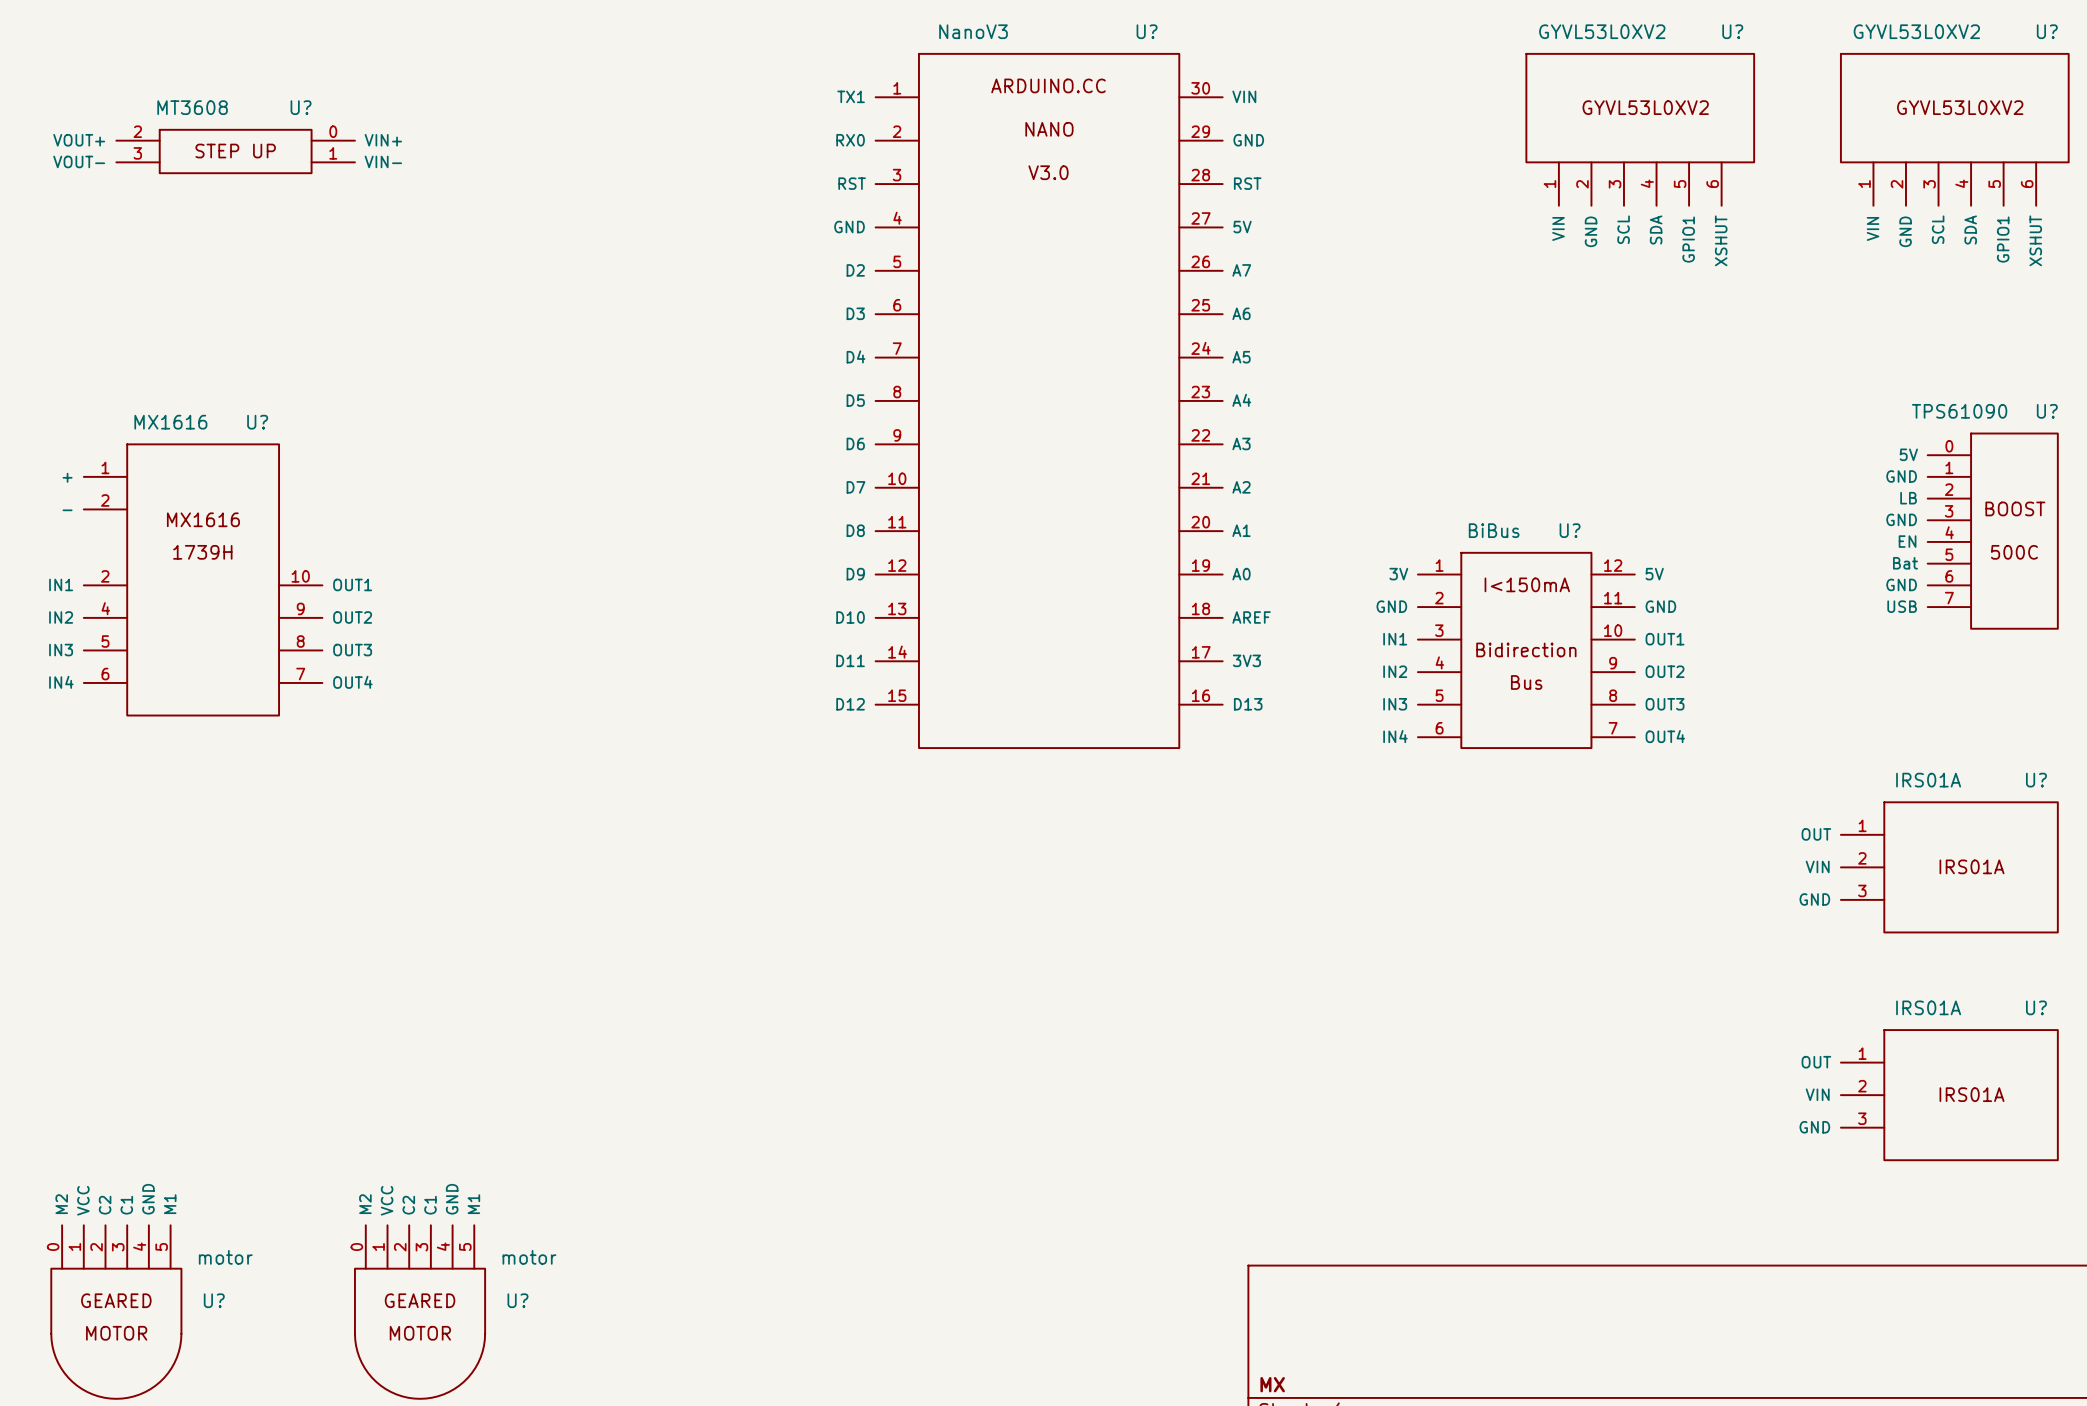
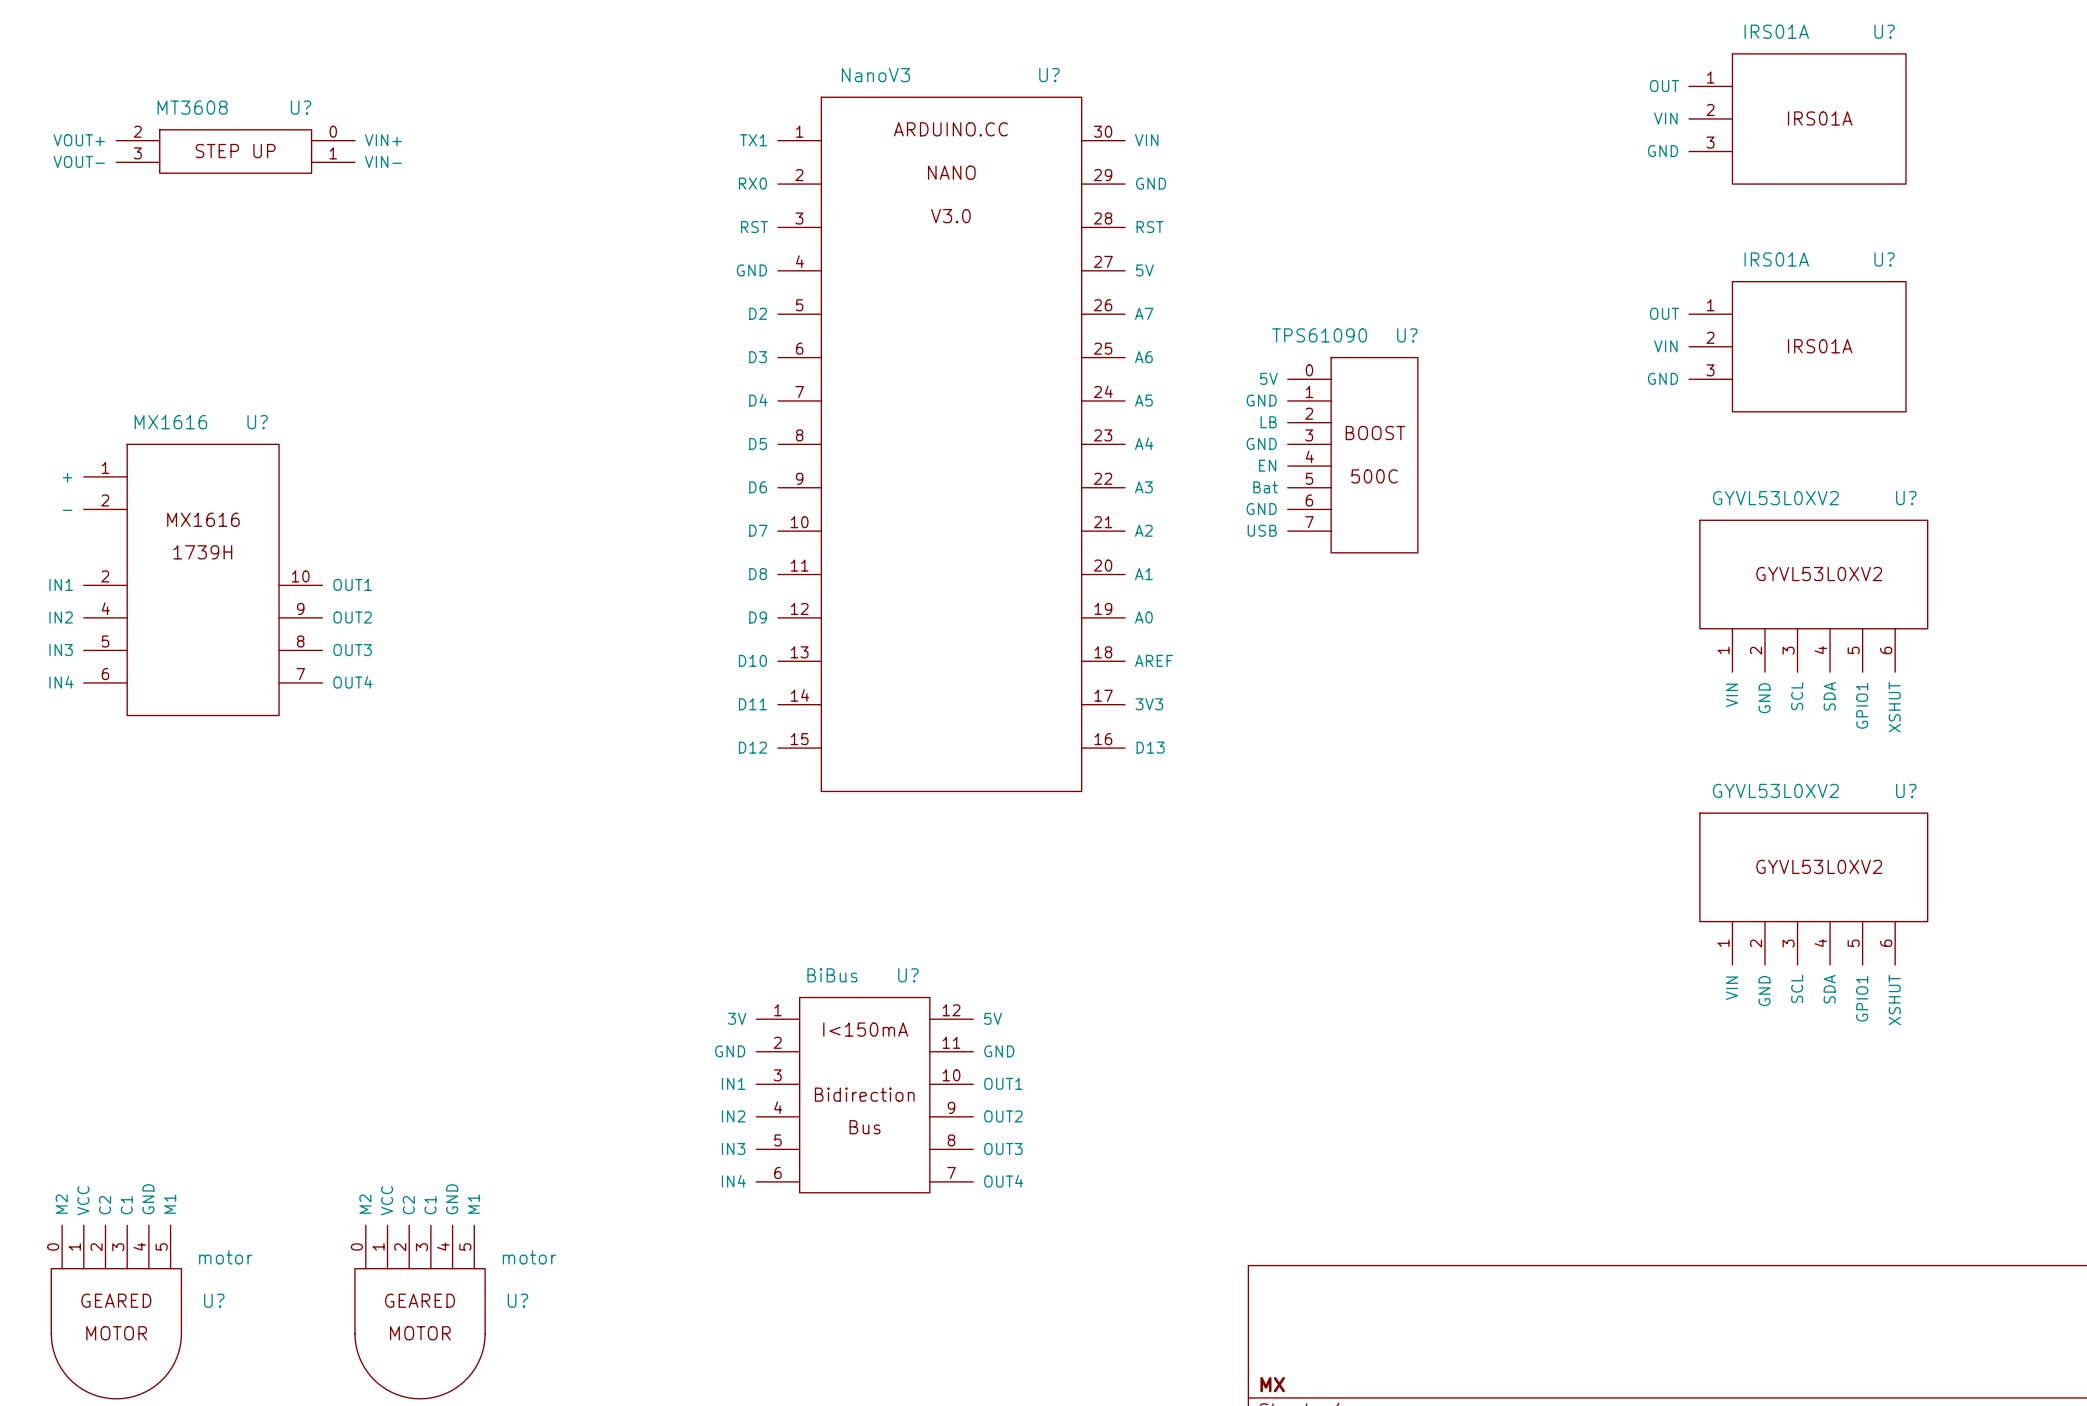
U?: none -> IRS01A (1797, 118)
U?: GYVL53L0XV2 (1640, 129) -> none
U?: GYVL53L0XV2 (1954, 129) -> none
U?: none -> IRS01A (1797, 346)
U? position: (669, 400) -> (571, 444)
U?: none -> TPS61090 (1352, 455)
U?: TPS61090 (1992, 531) -> none
U?: none -> GYVL53L0XV2 (1813, 596)
U?: BiBus (1526, 650) -> none
U?: IRS01A (1949, 867) -> none
U?: none -> GYVL53L0XV2 (1813, 889)
U?: none -> BiBus (864, 1095)
U?: IRS01A (1949, 1095) -> none

